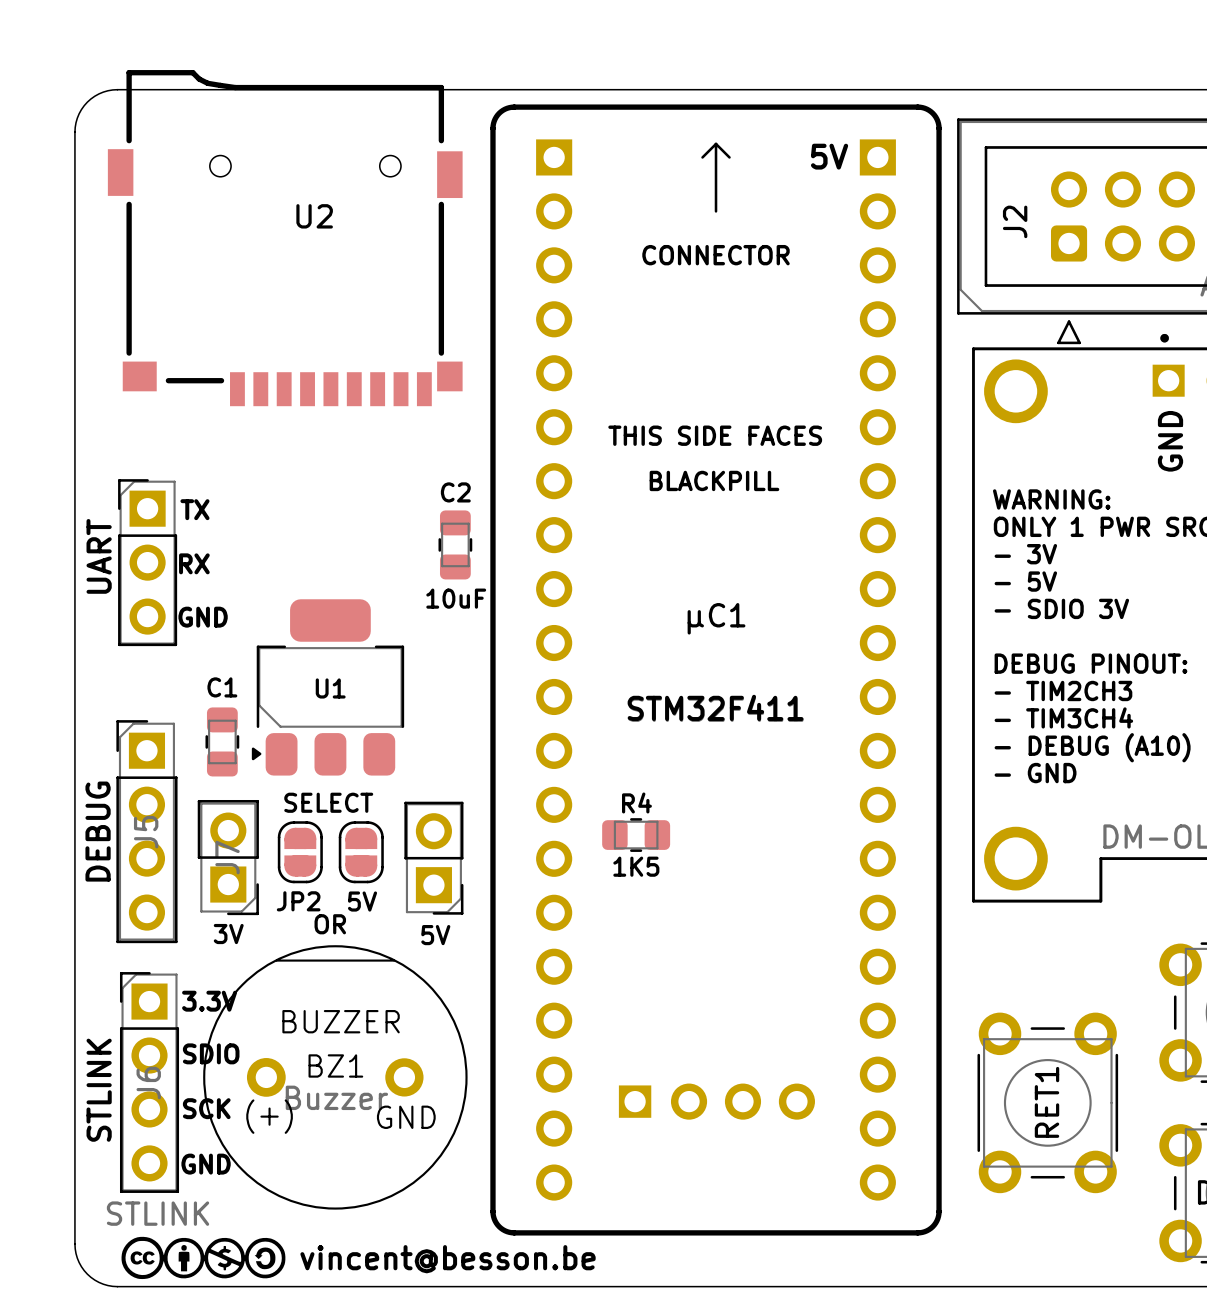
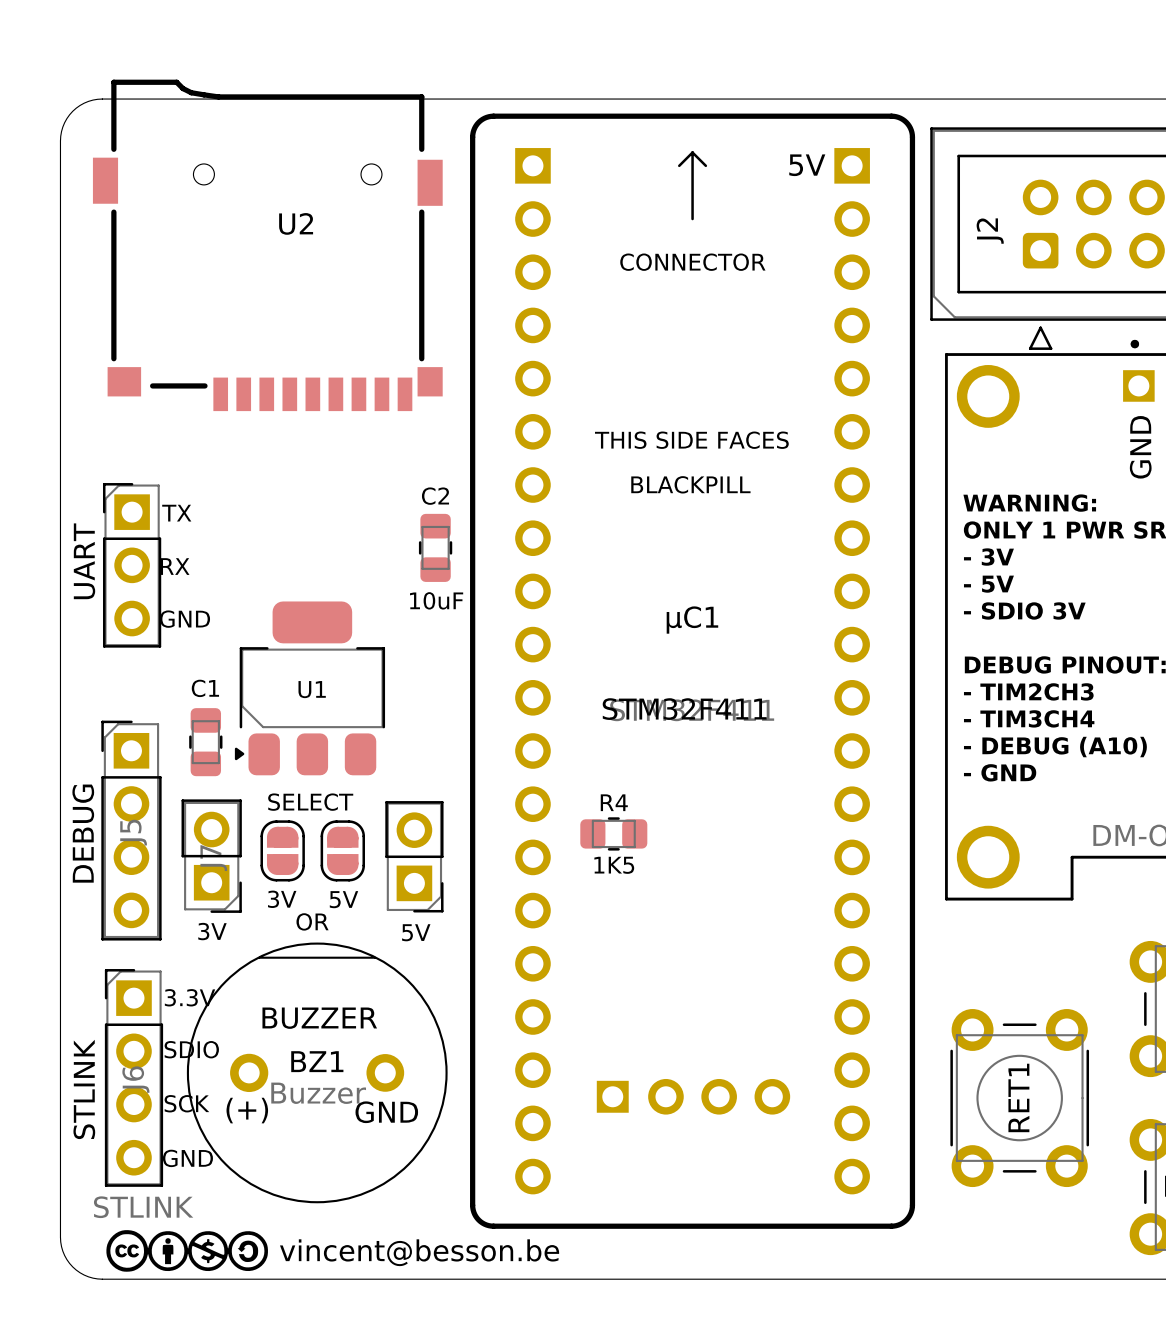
JP2 name: JP2 (298, 901) -> 3V (282, 899)

